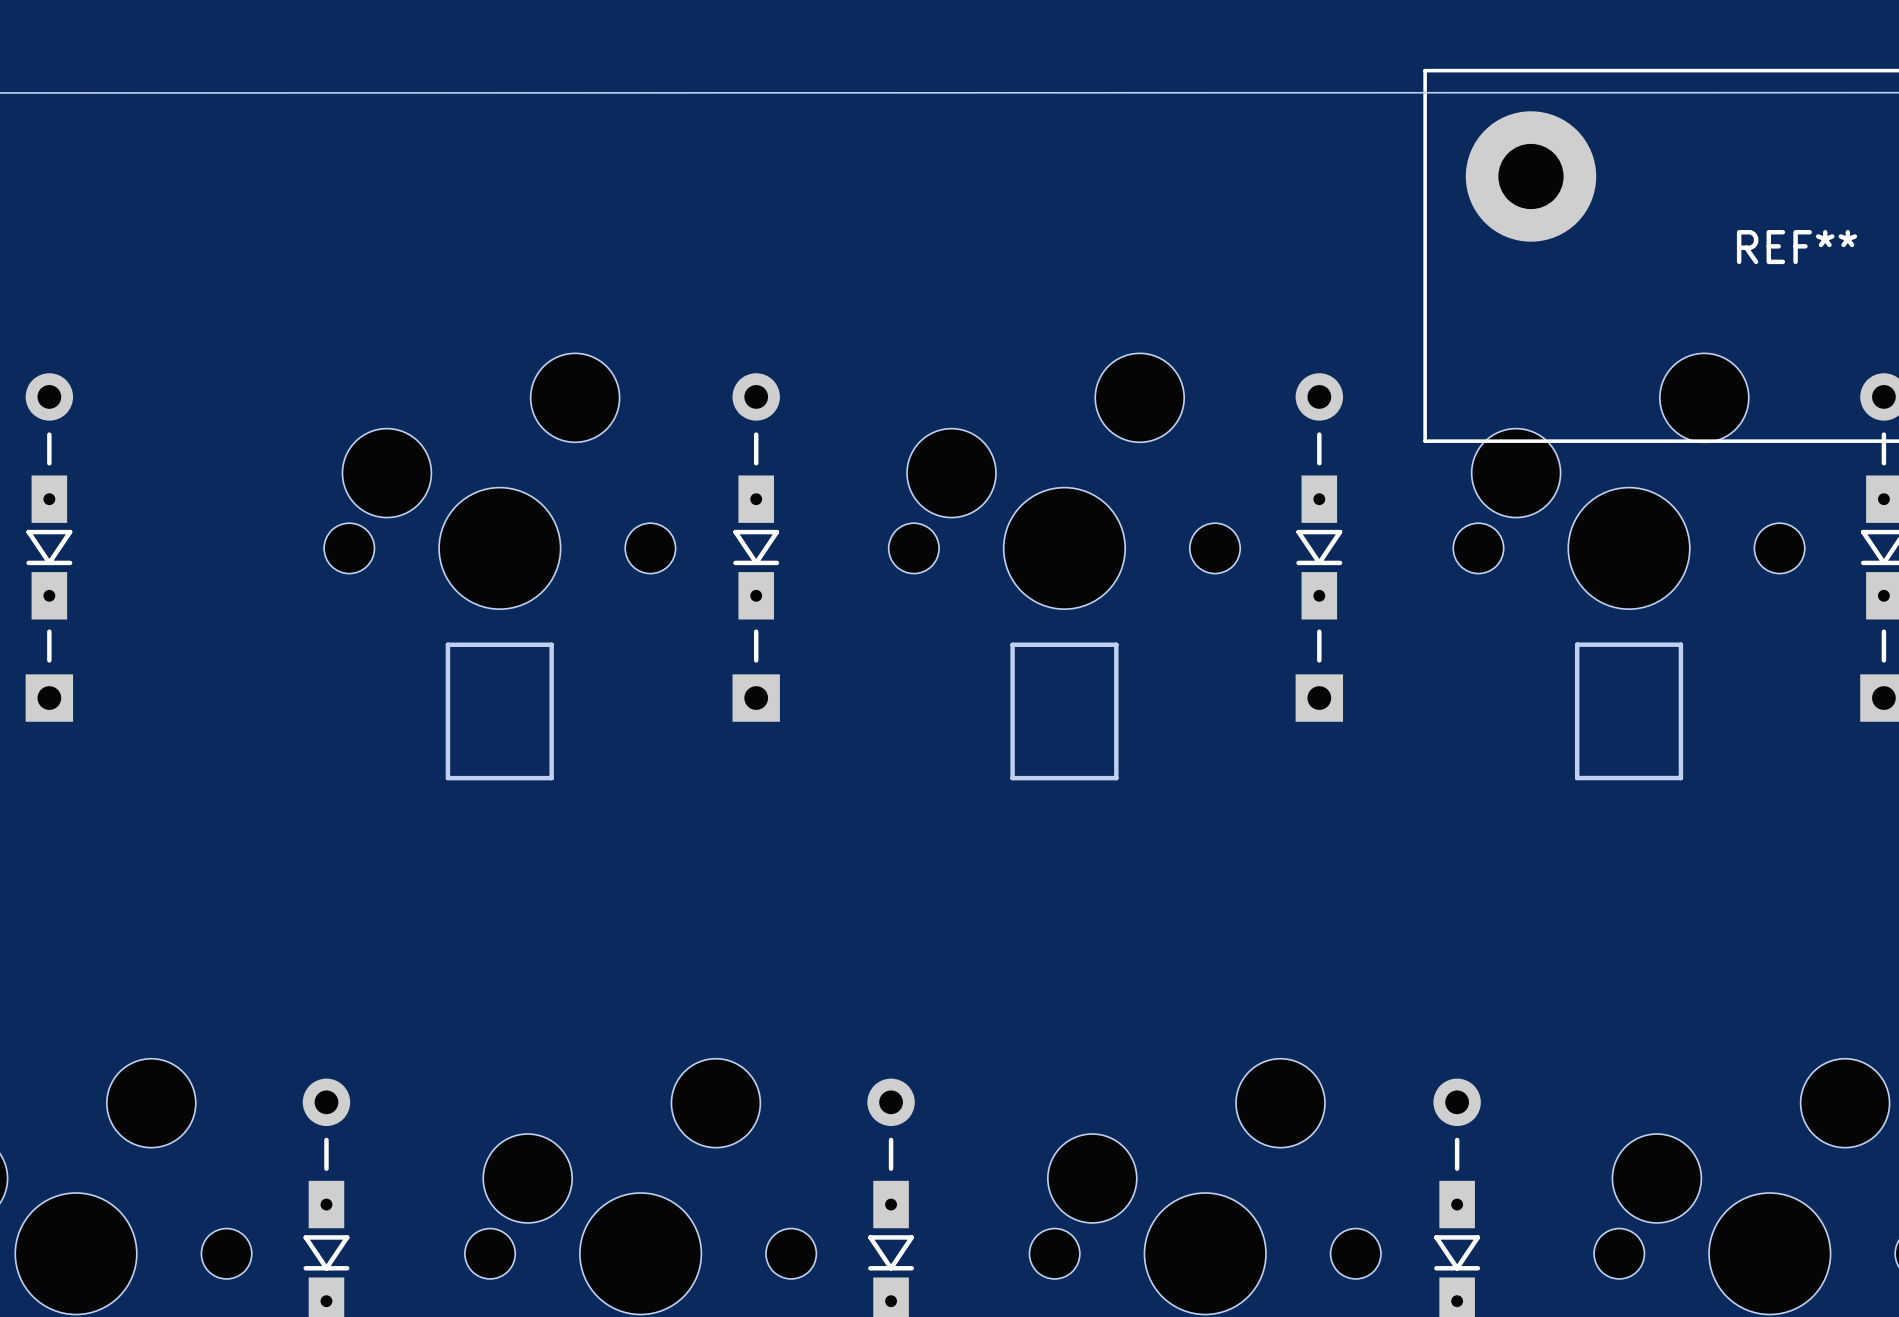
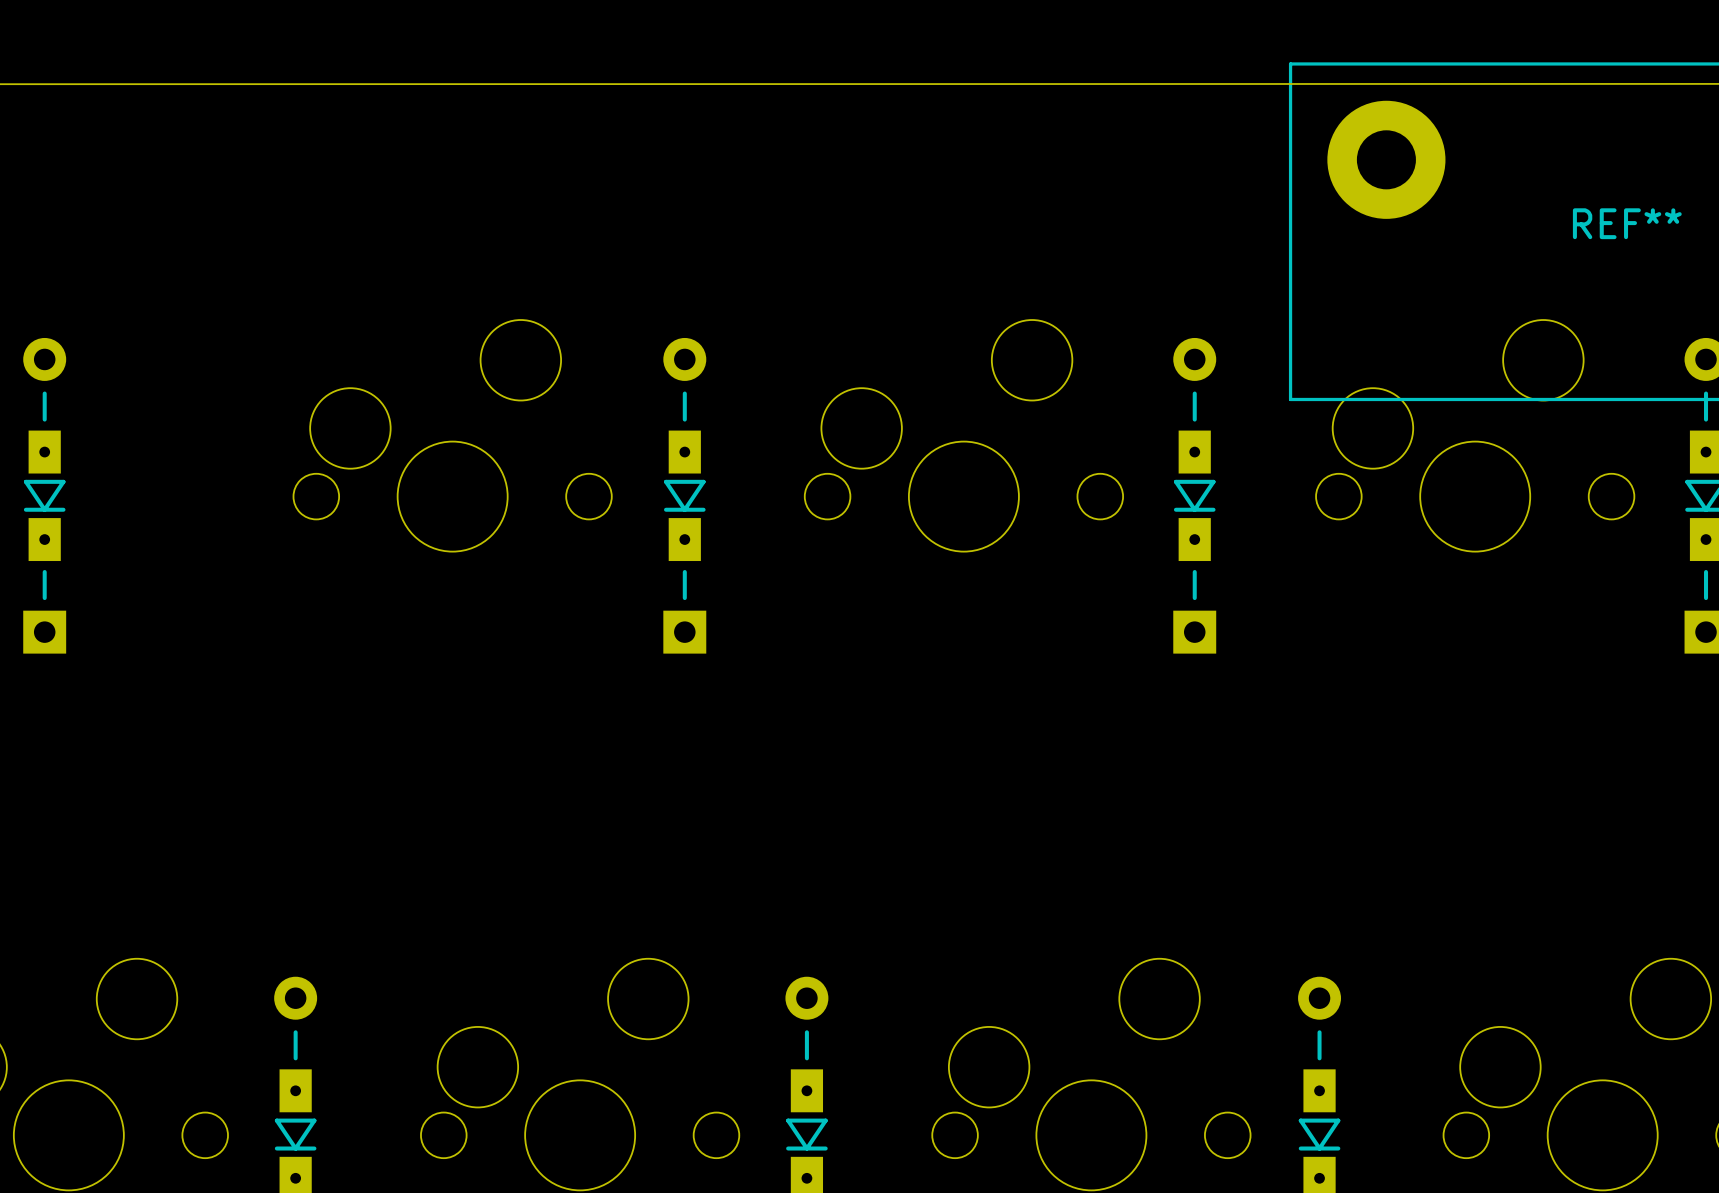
board edge: (447, 644) (551, 644) (551, 778) (447, 778) (447, 644) -> none
board edge: (1012, 644) (1116, 644) (1116, 778) (1012, 778) (1012, 644) -> none
board edge: (1577, 644) (1680, 644) (1680, 778) (1577, 778) (1577, 644) -> none

